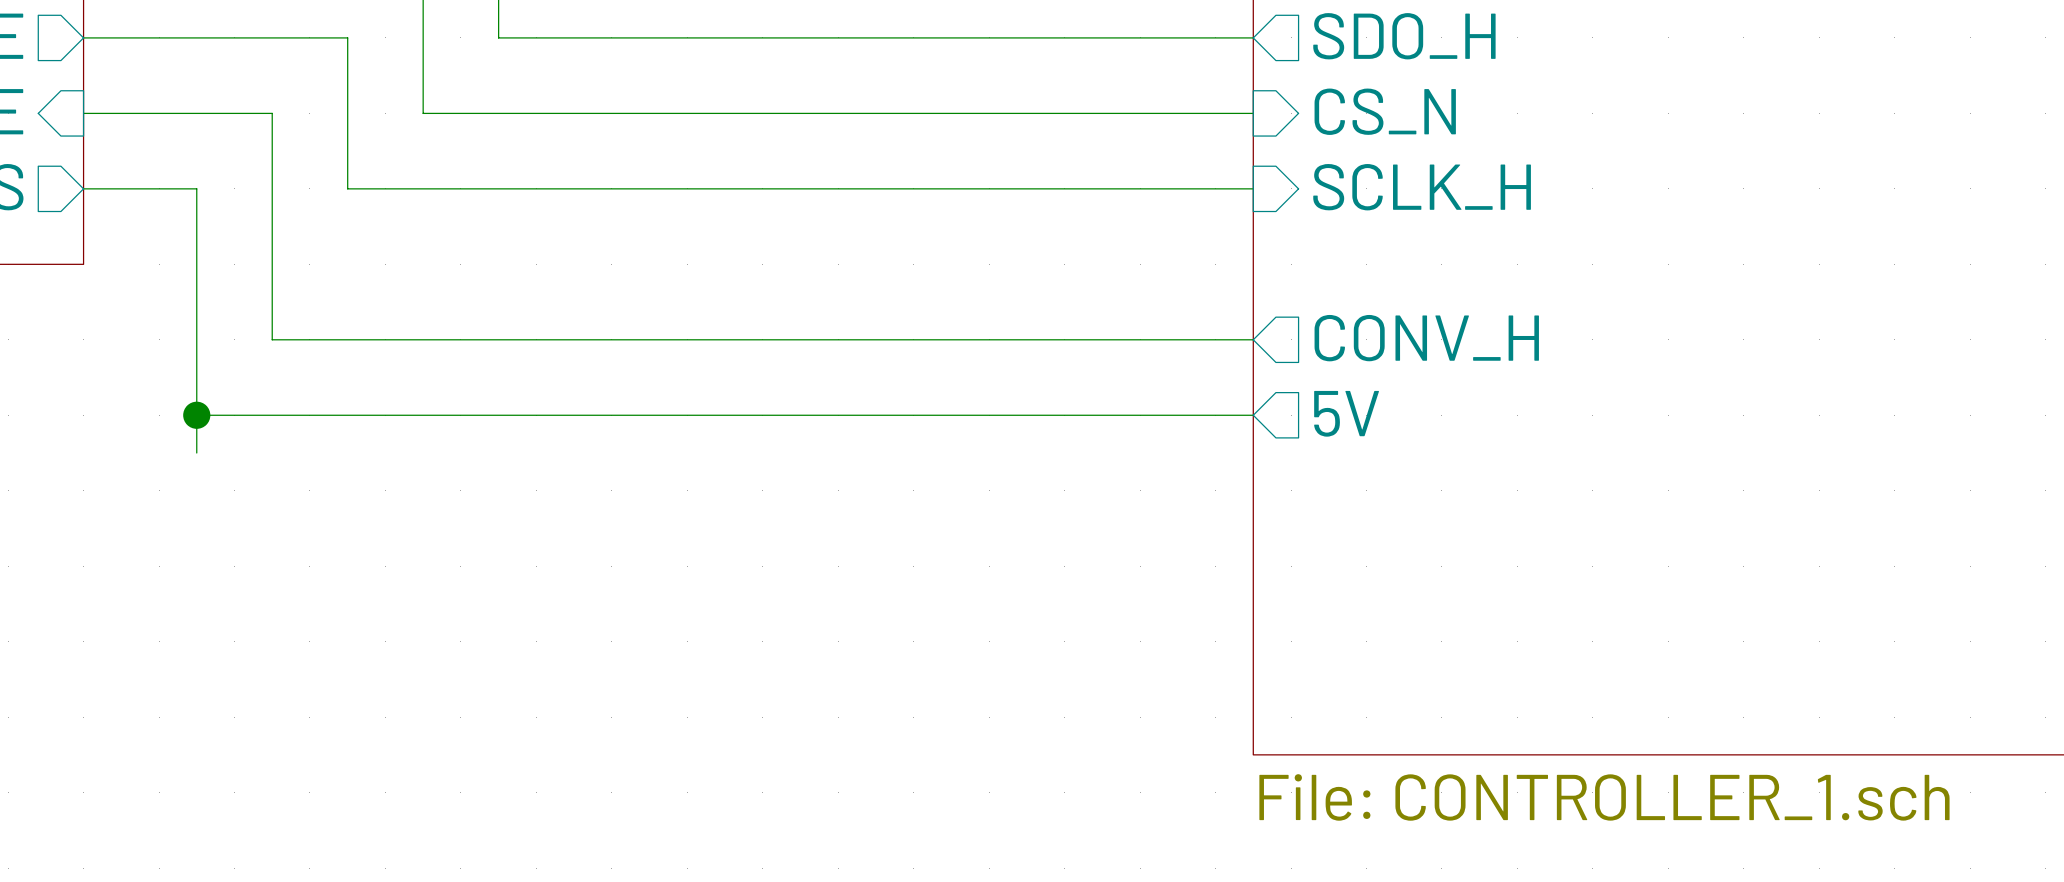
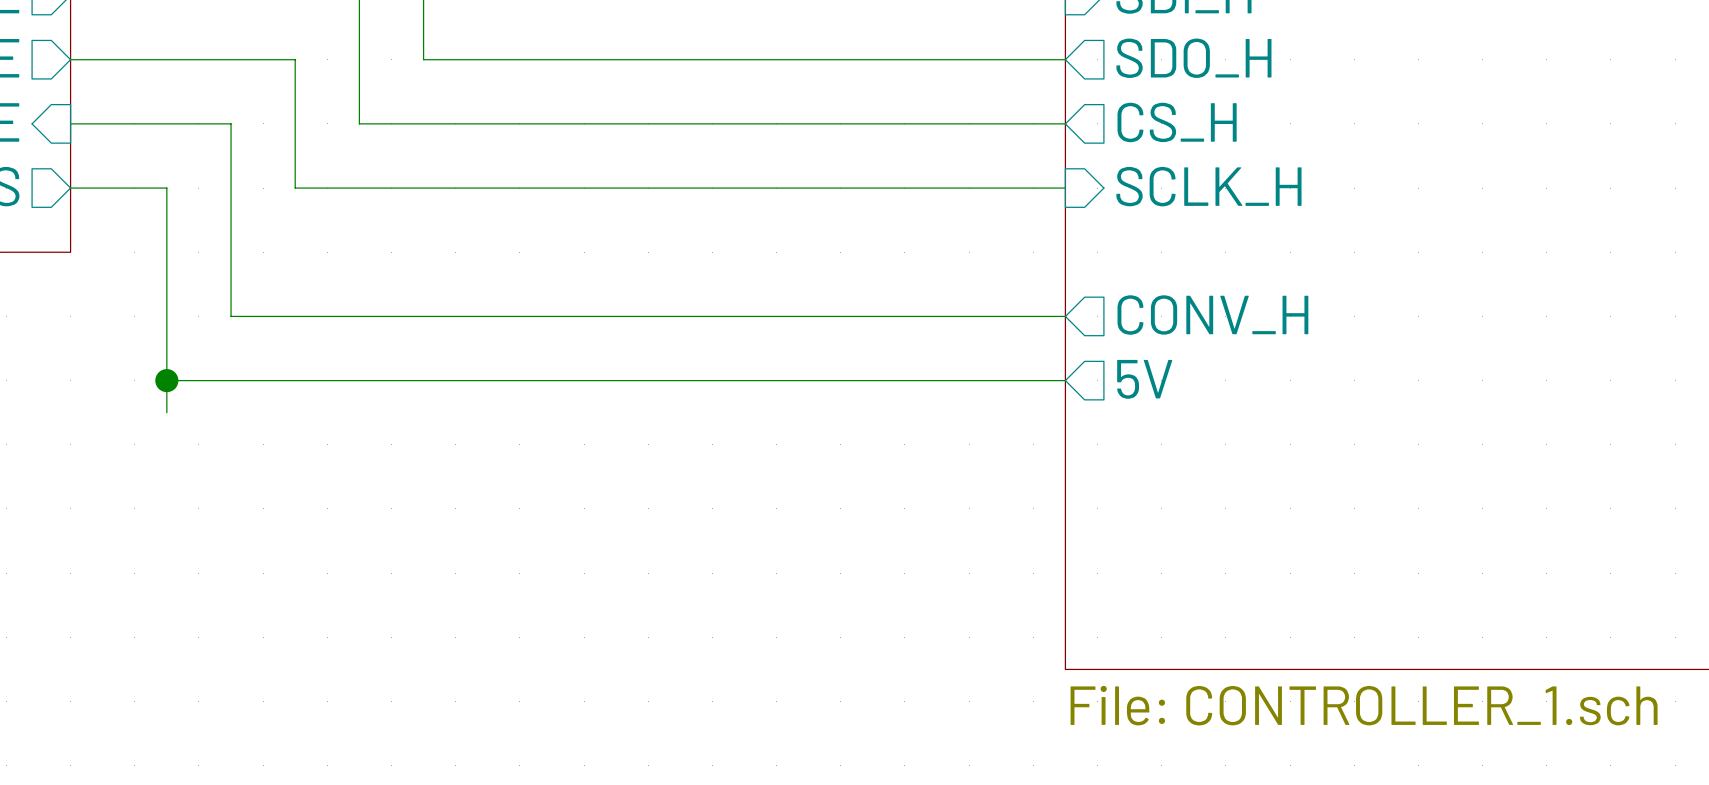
sheet pin shape: input (1385, 111) -> output (1177, 122)
sheet pin: CS_N (1385, 111) -> CS_H (1177, 122)

